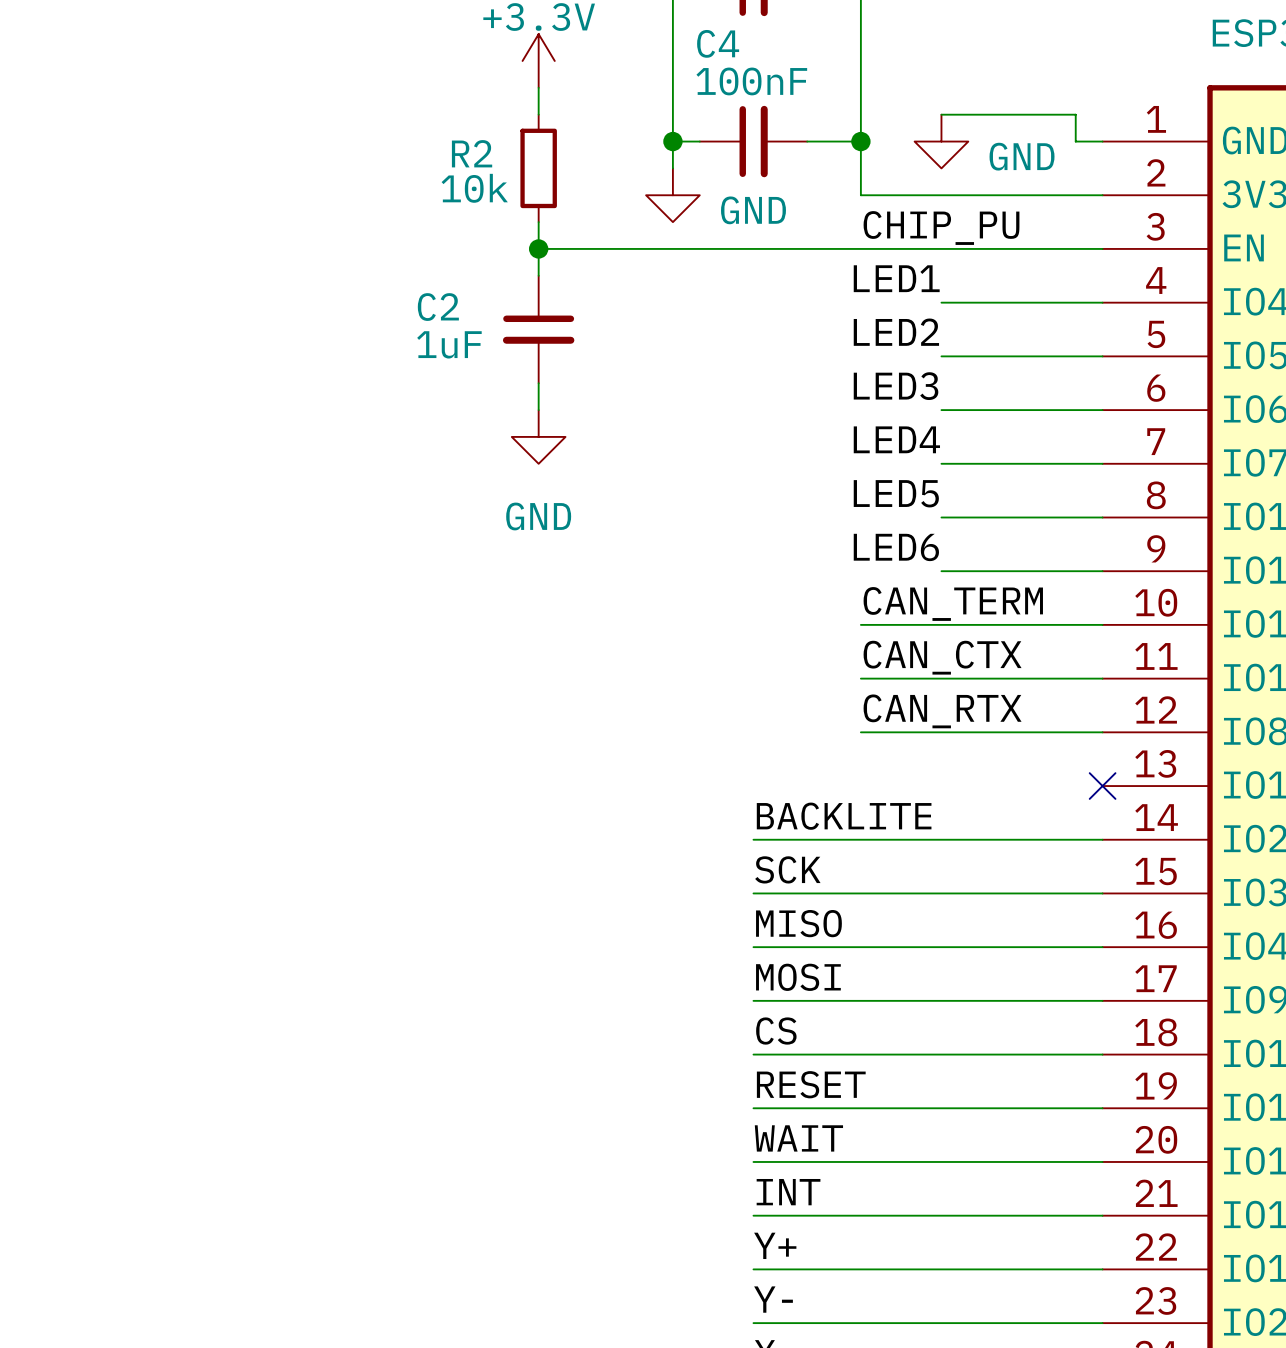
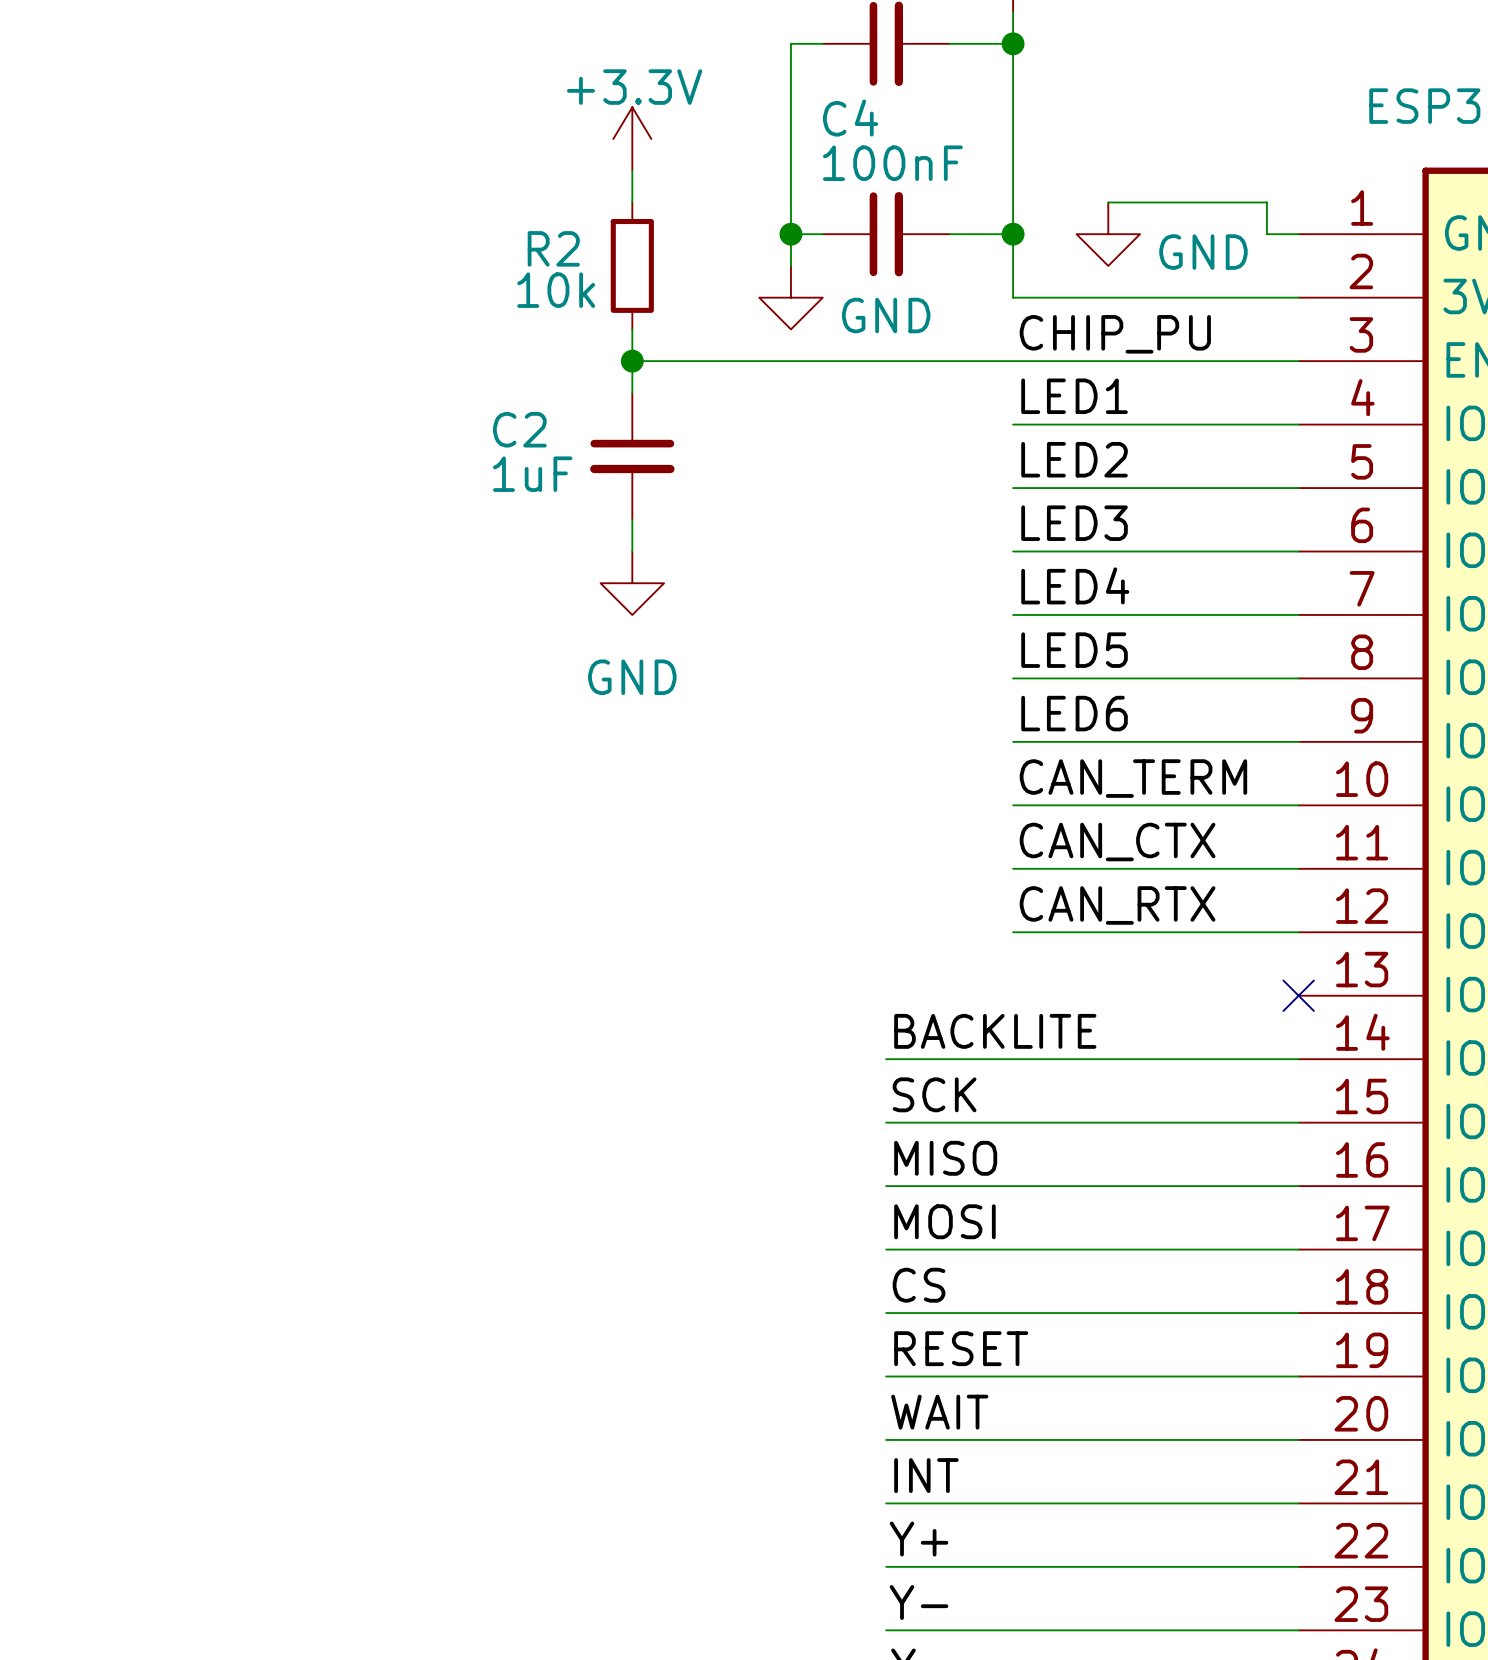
label position: LED1 (896, 278) -> LED1 (1074, 396)
wire: none -> (1013, 424) (1108, 424)
label position: LED2 (896, 332) -> LED2 (1074, 459)
wire: none -> (1013, 488) (1108, 488)
label position: LED3 (896, 386) -> LED3 (1074, 523)
wire: none -> (1013, 551) (1108, 551)
label position: LED4 (896, 439) -> LED4 (1075, 585)
wire: none -> (1013, 614) (1108, 614)
label position: LED5 (896, 493) -> LED5 (1074, 650)
wire: none -> (1013, 678) (1108, 678)
label position: LED6 (896, 547) -> LED6 (1074, 713)
wire: none -> (1013, 741) (1108, 741)

